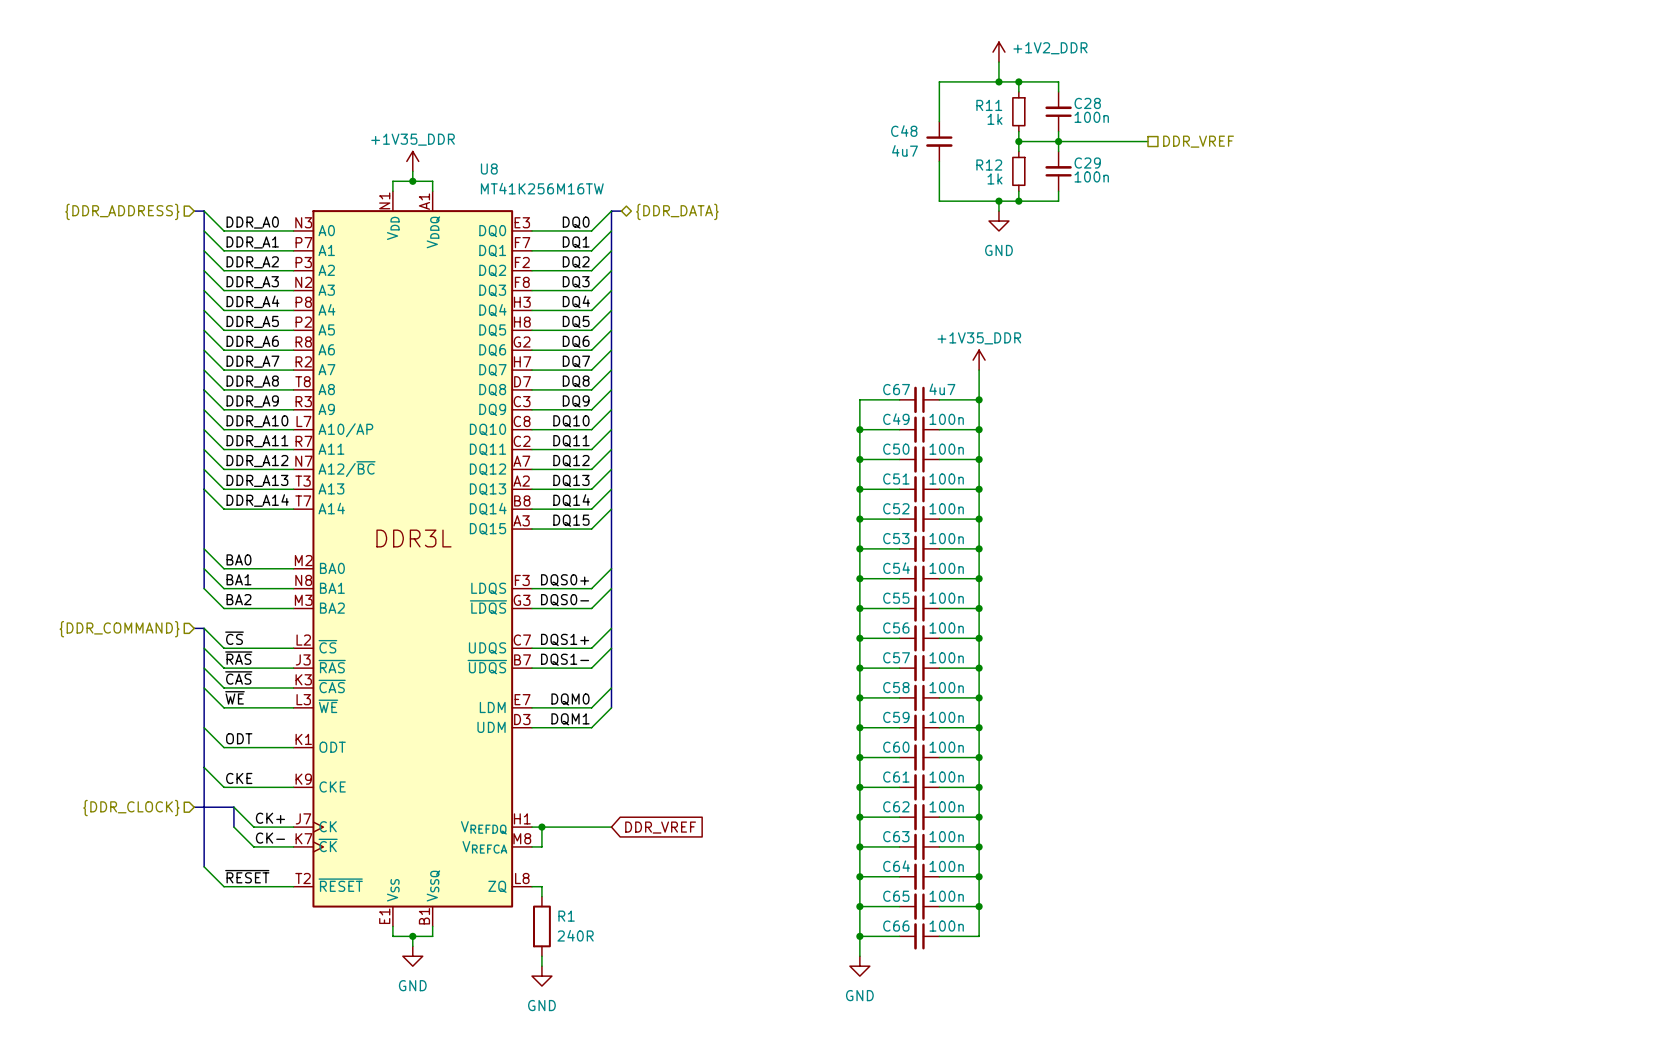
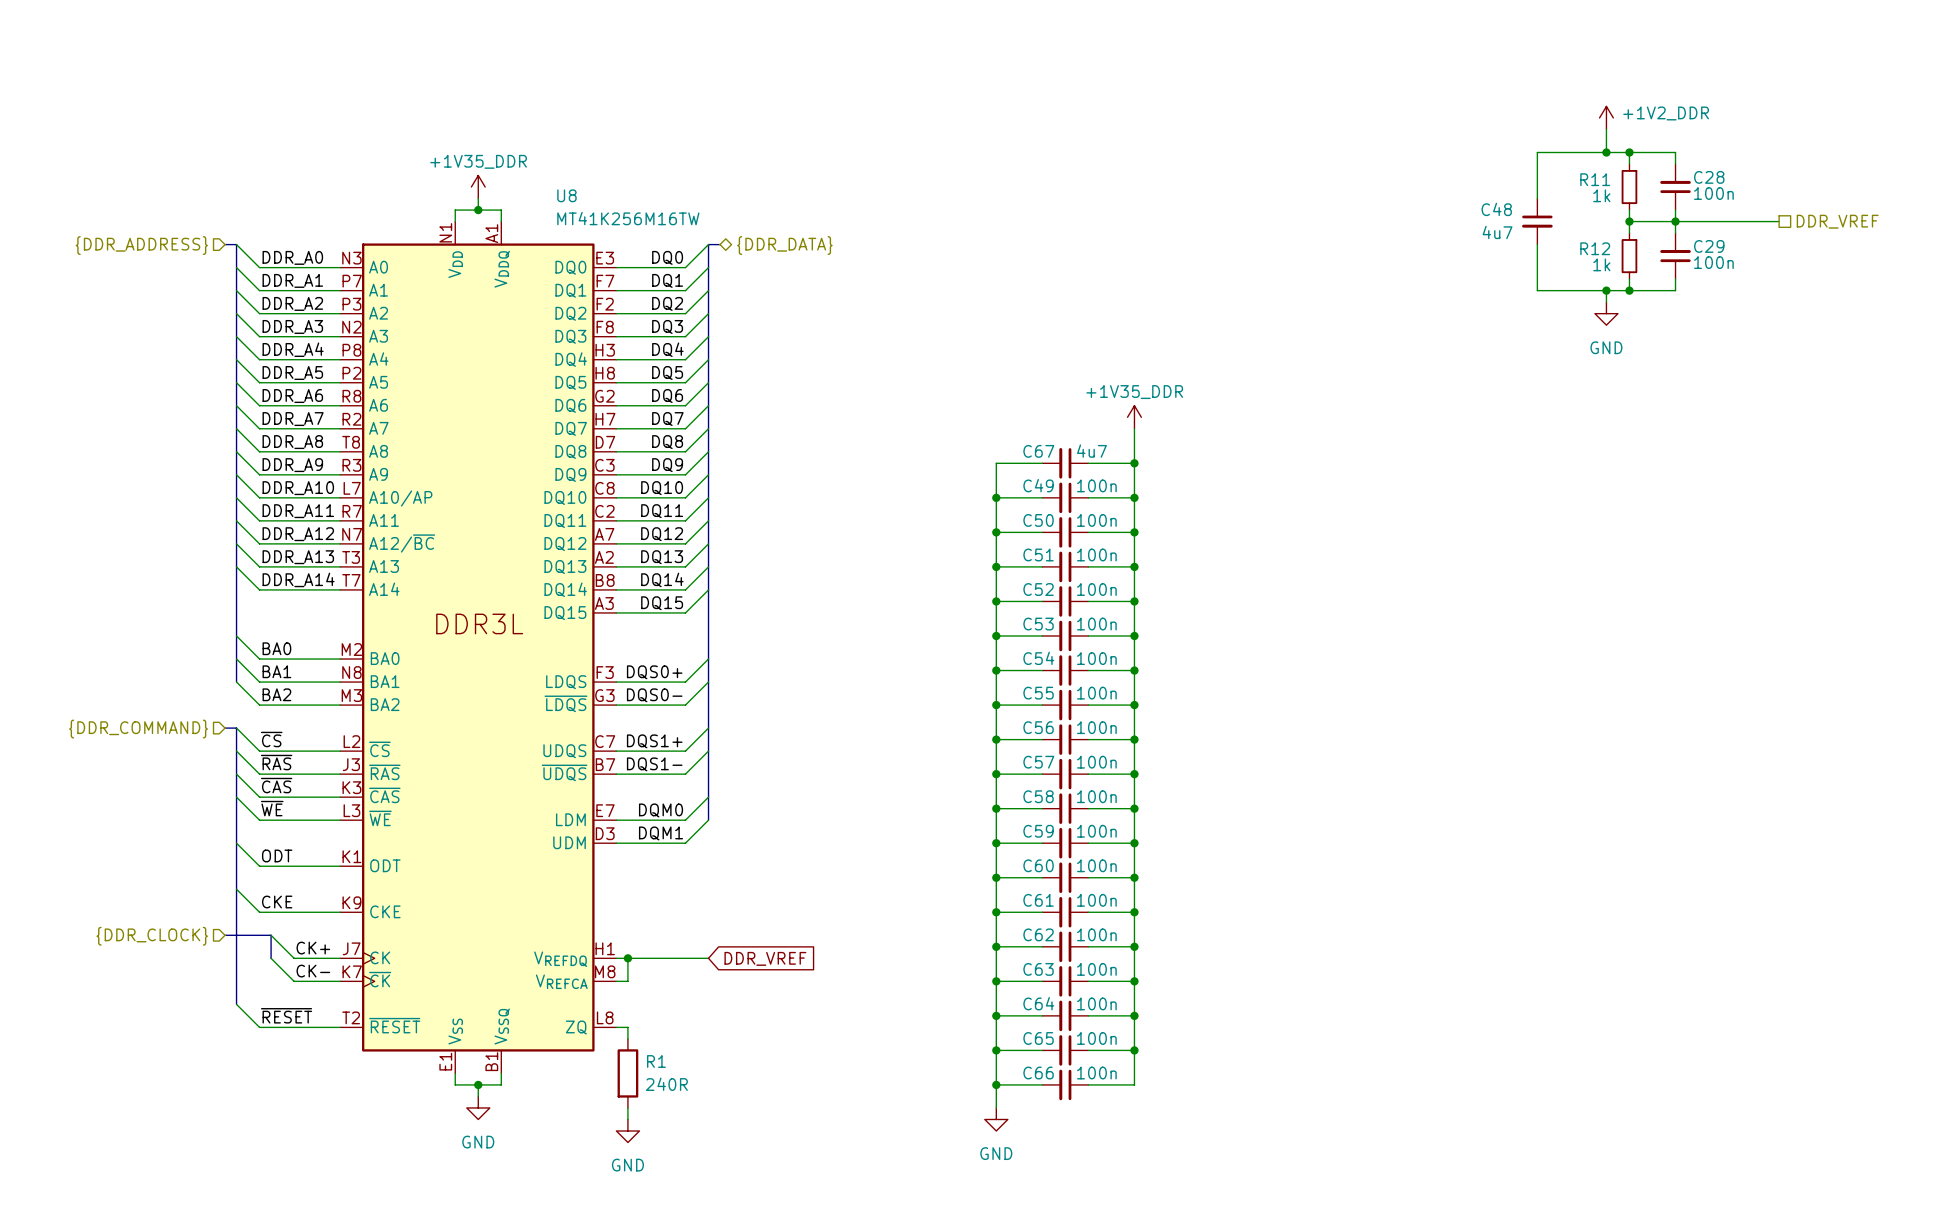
power symbol: +1V2_DDR (998, 52) -> none
wire: (998, 62) (998, 81) -> none
junction: (998, 81) -> none
wire: (1018, 81) (1018, 91) -> none
junction: (1018, 81) -> none
wire: (1058, 91) (1058, 81) (939, 81) (939, 121) -> none
power symbol: none -> +1V2_DDR (1606, 117)
R11 position: (1018, 111) -> (1629, 187)
C28 position: (1058, 111) -> (1675, 187)
wire: none -> (1606, 129) (1606, 152)
wire: (1018, 131) (1018, 151) -> none
wire: (1058, 131) (1058, 151) -> none
junction: none -> (1606, 152)
wire: none -> (1629, 152) (1629, 164)
junction: none -> (1629, 152)
C48 position: (939, 141) -> (1537, 221)
wire: (1018, 141) (1148, 141) -> none
junction: (1018, 141) -> none
junction: (1058, 141) -> none
hierarchical label: DDR_VREF (1198, 141) -> none
wire: none -> (1675, 164) (1675, 152) (1537, 152) (1537, 198)
wire: (939, 161) (939, 201) (1058, 201) (1058, 191) -> none
R12 position: (1018, 171) -> (1629, 256)
C29 position: (1058, 171) -> (1675, 256)
wire: none -> (1629, 210) (1629, 233)
wire: none -> (1675, 210) (1675, 233)
wire: (1018, 191) (1018, 201) -> none
wire: none -> (1629, 221) (1779, 221)
junction: none -> (1629, 221)
junction: none -> (1675, 221)
hierarchical label: none -> DDR_VREF (1837, 221)
wire: (998, 201) (998, 211) -> none
junction: (998, 201) -> none
junction: (1018, 201) -> none
wire: none -> (1537, 244) (1537, 290) (1675, 290) (1675, 279)
power symbol: GND (998, 221) -> none
wire: none -> (1629, 279) (1629, 290)
wire: none -> (1606, 290) (1606, 302)
junction: none -> (1606, 290)
junction: none -> (1629, 290)
power symbol: none -> GND (1606, 313)

